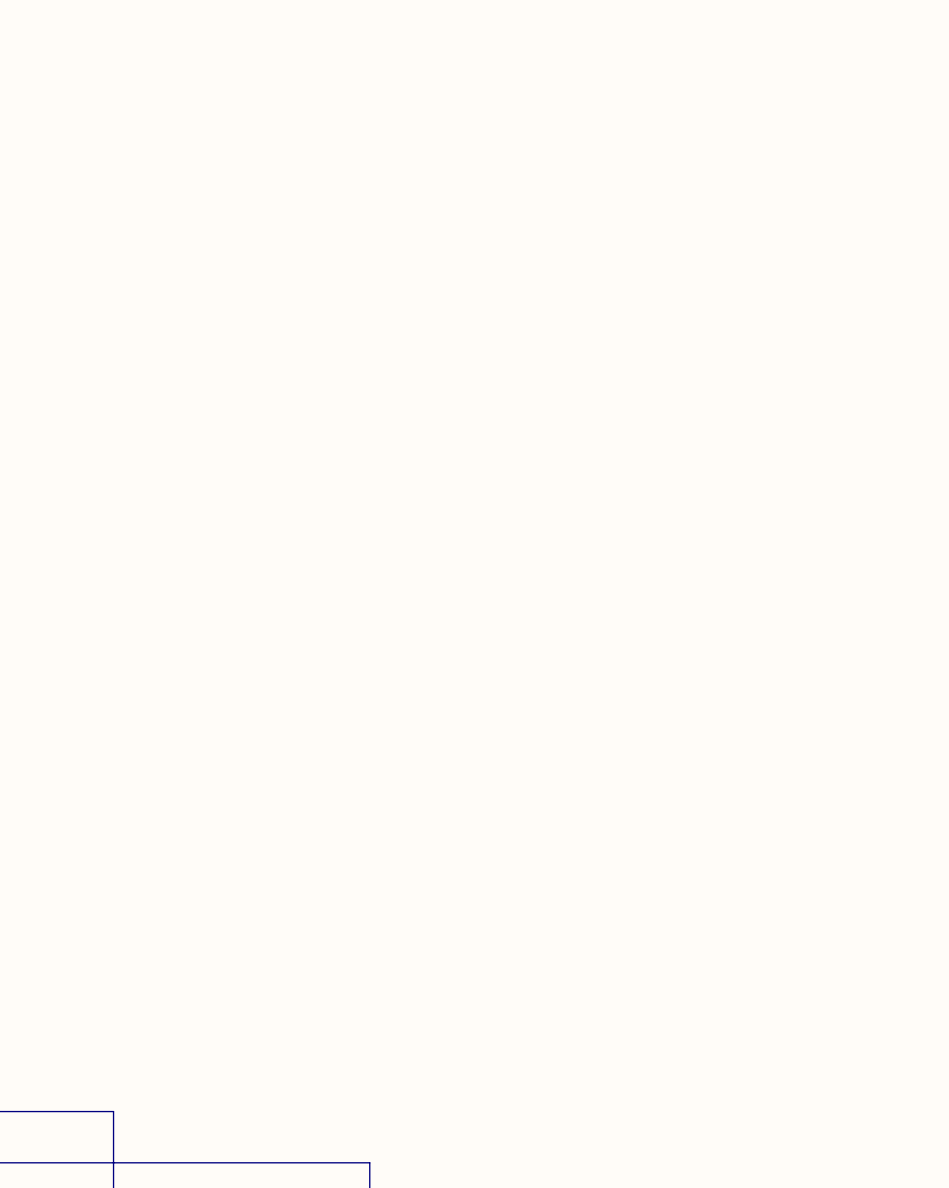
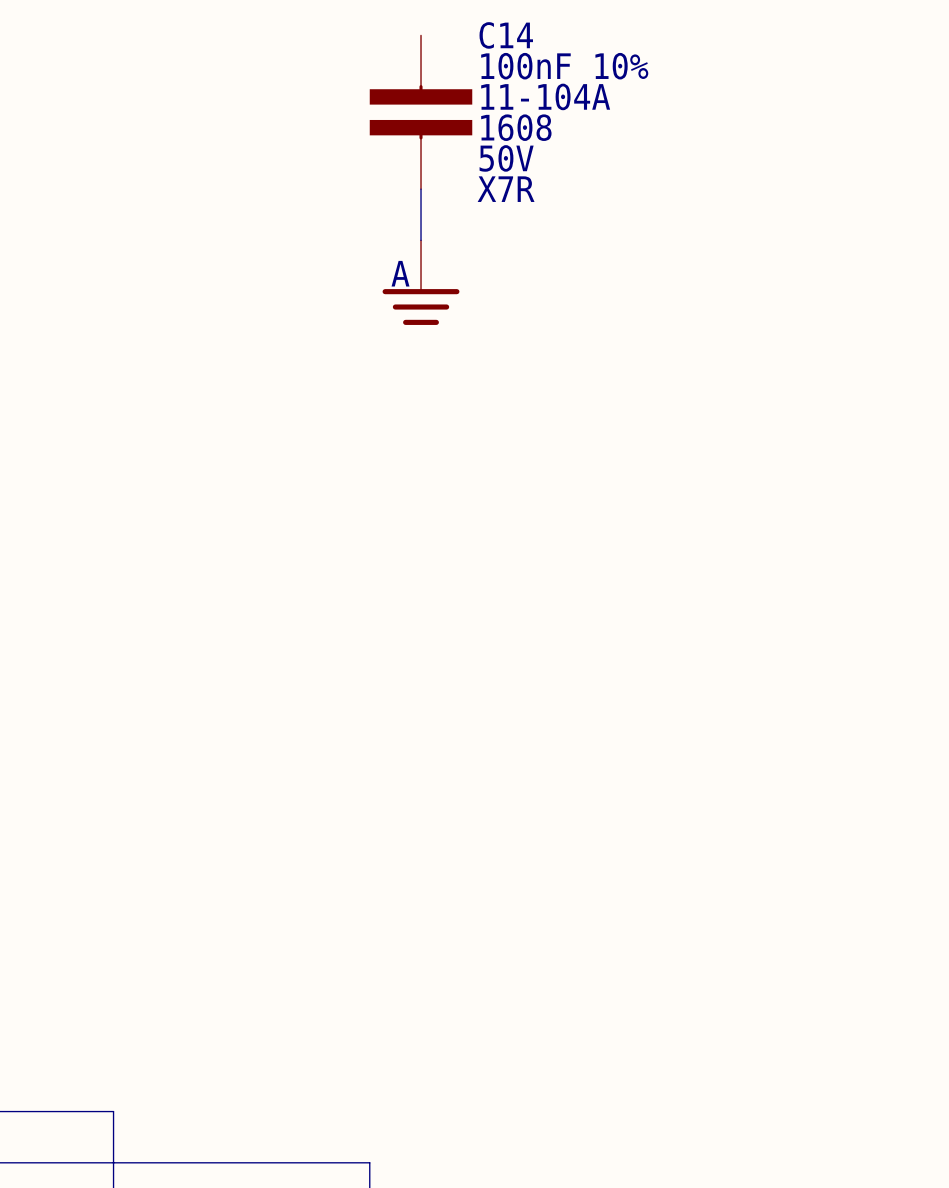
C14: none -> 100nF 10% (421, 112)
wire: none -> (421, 189) (421, 240)
power symbol: none -> (421, 282)

